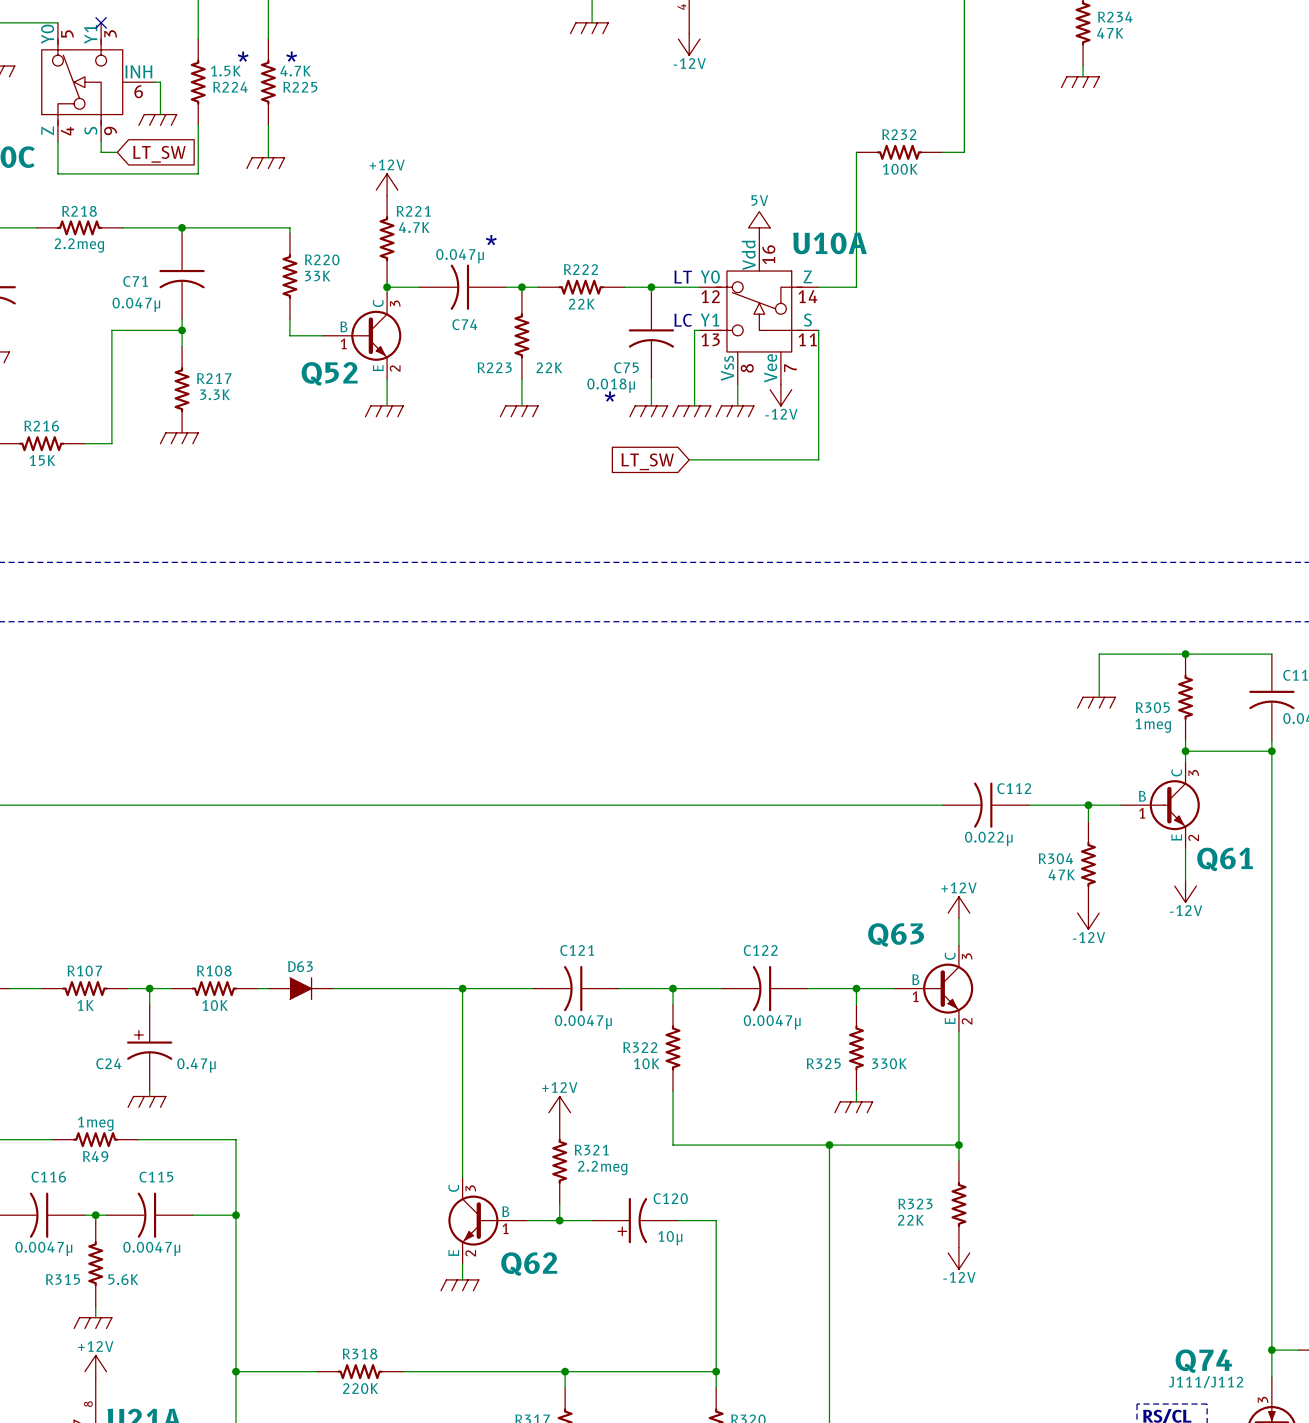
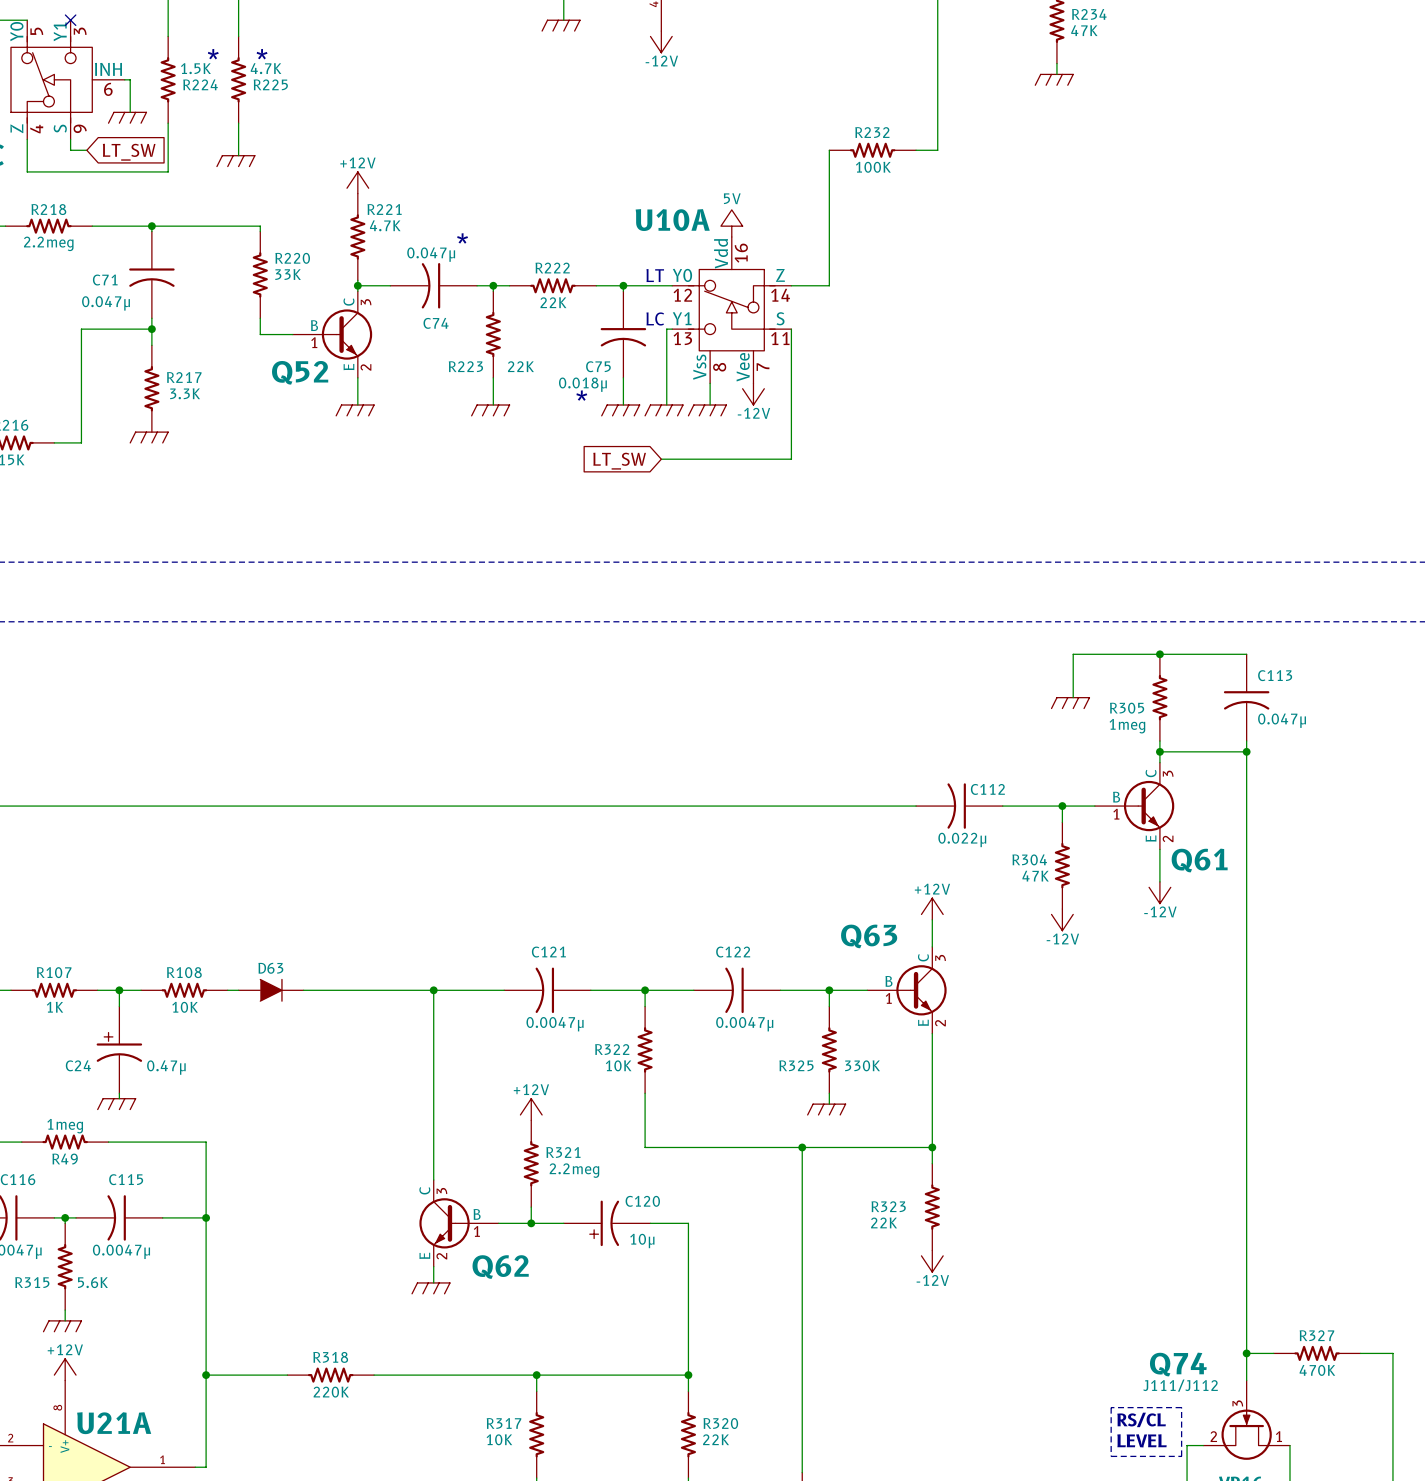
U10A name position: U10A (829, 243) -> U10A (672, 220)

